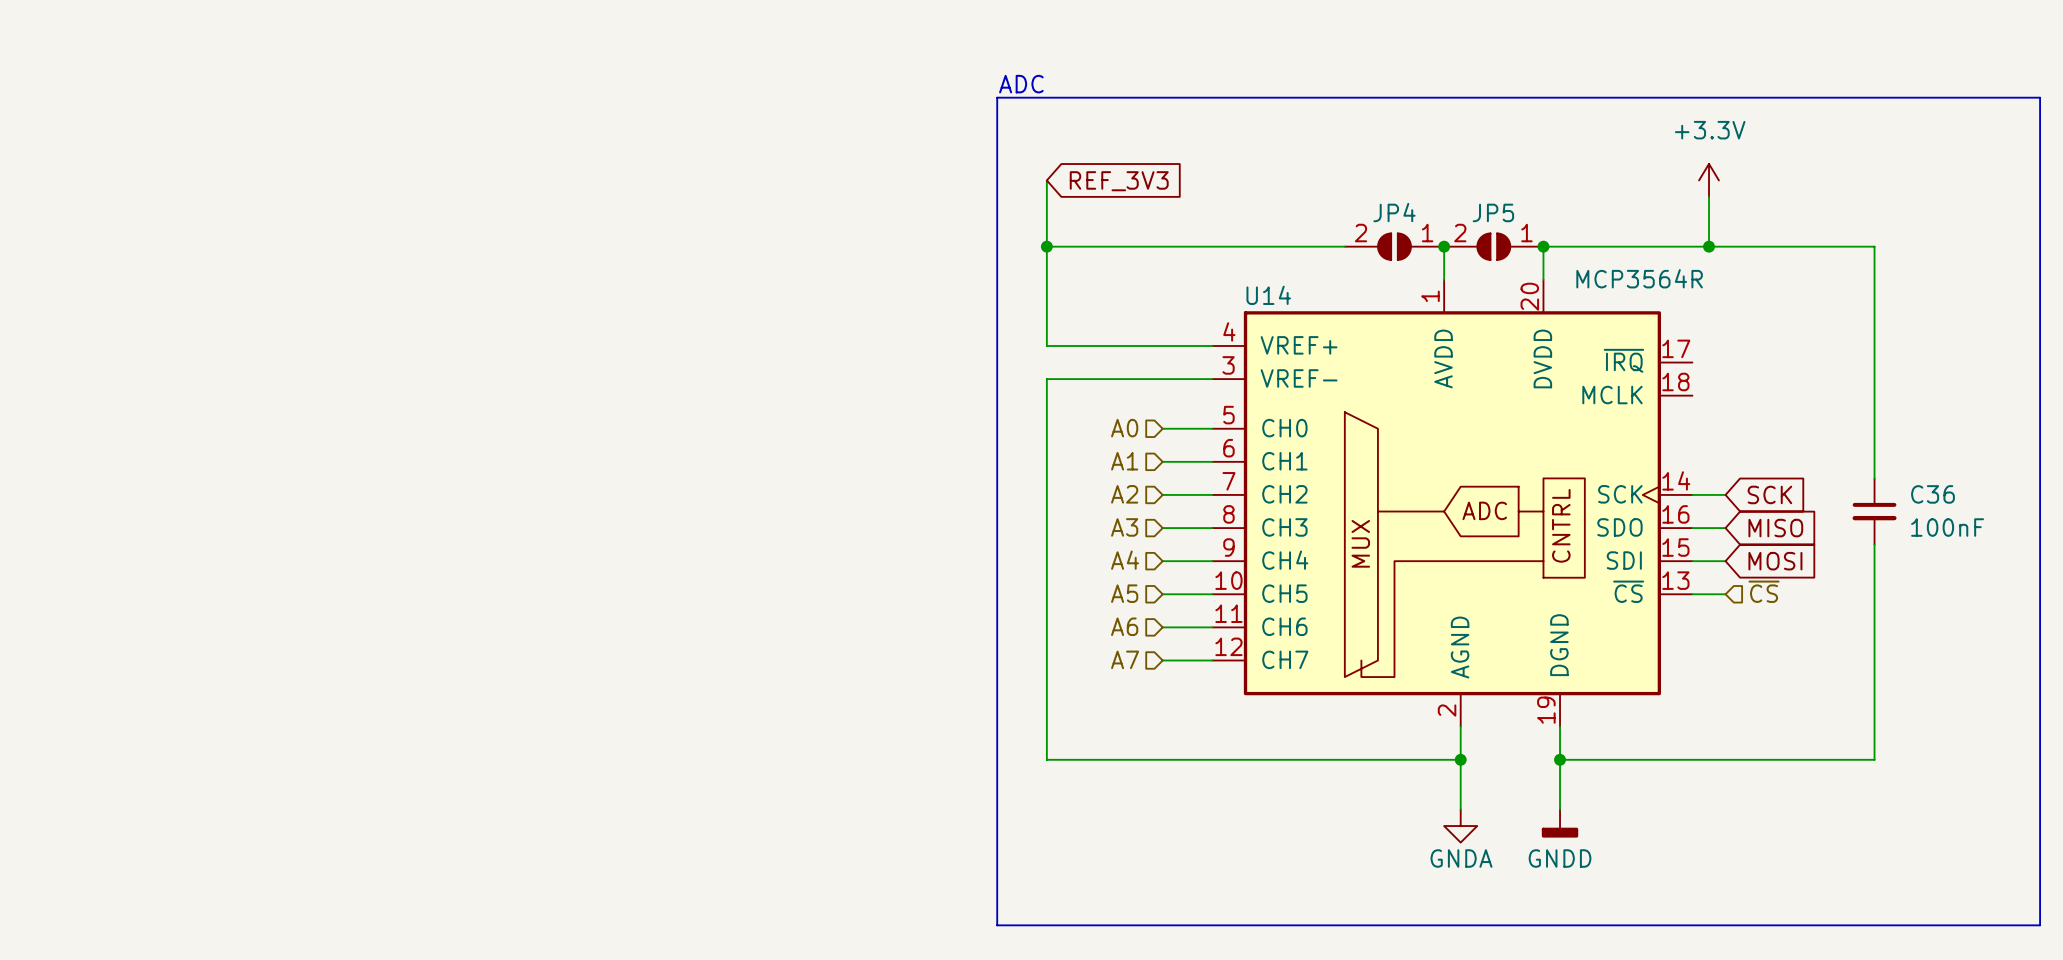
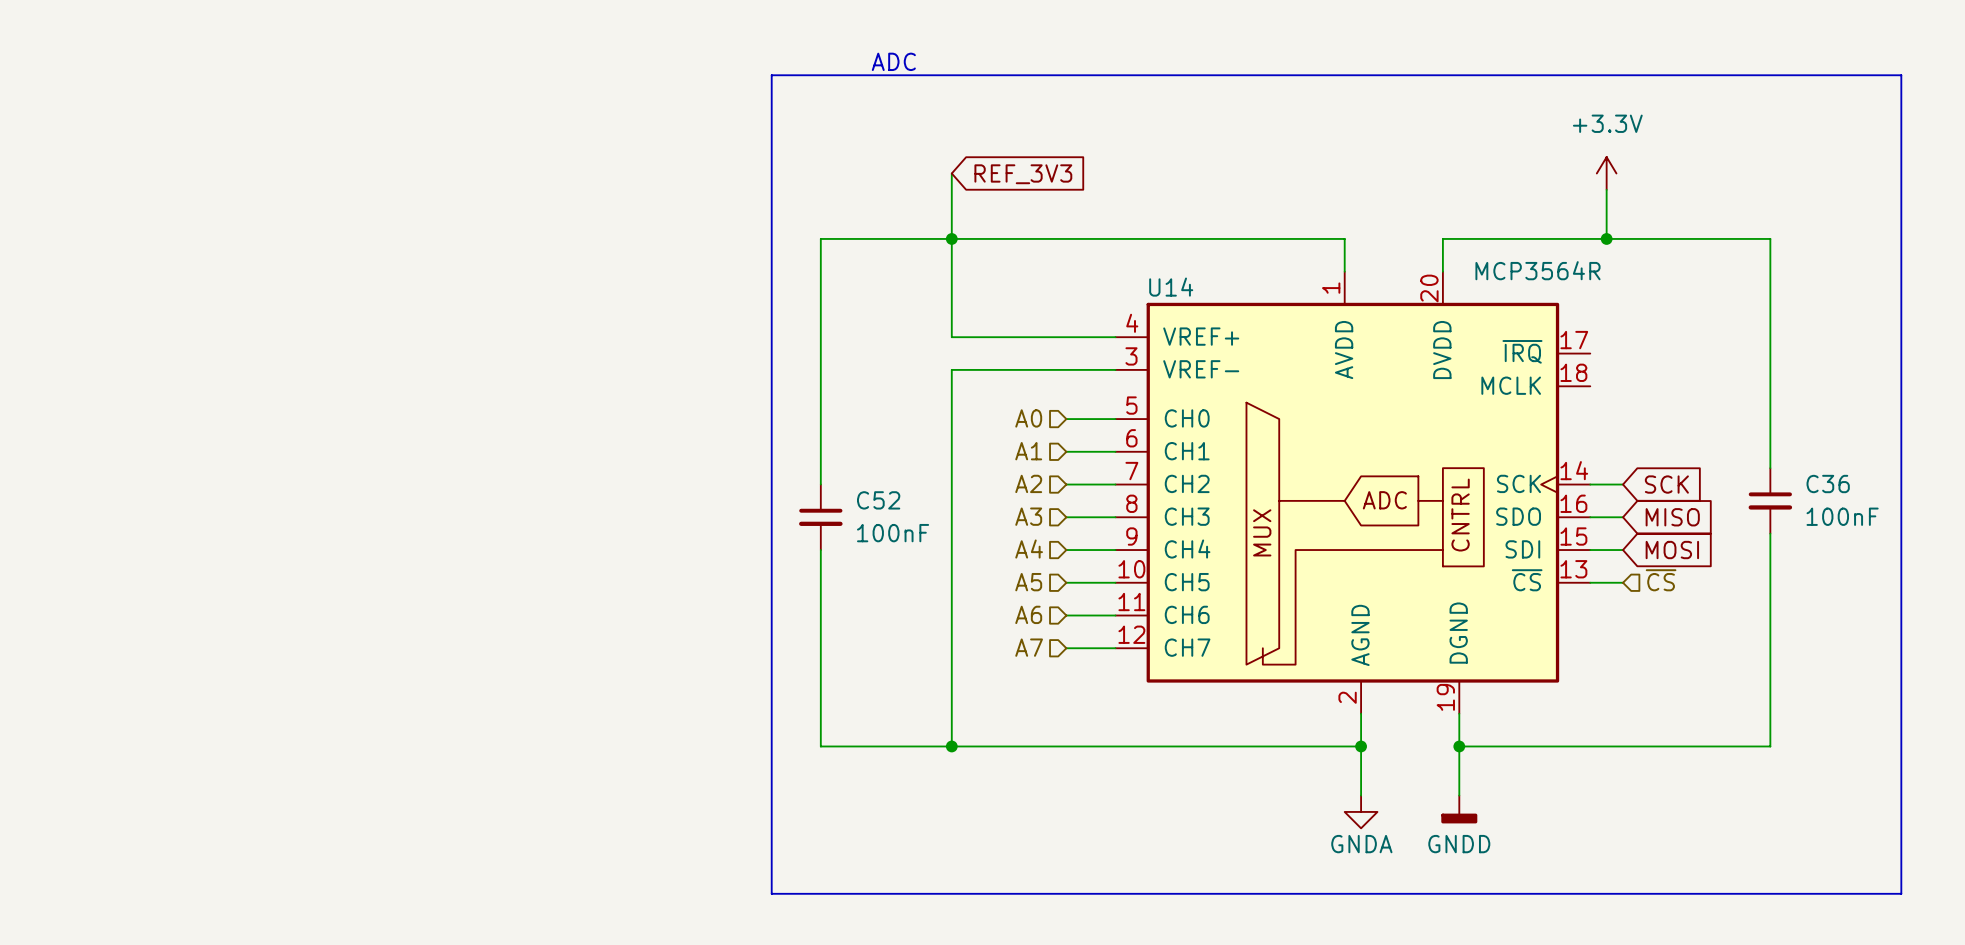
text position: ADC (1021, 84) -> ADC (893, 61)
line: (997, 97) (2040, 97) (2040, 925) (997, 925) (997, 97) -> (771, 75) (771, 893) (1901, 893) (1901, 75) (771, 75)
wire: none -> (951, 238) (820, 238) (820, 484)
JP4: (1394, 246) -> none
junction: (1444, 246) -> none
JP5: (1493, 246) -> none
junction: (1543, 246) -> none
C52: none -> 100nF (820, 517)
wire: none -> (820, 550) (820, 746) (951, 746)
junction: none -> (951, 746)

